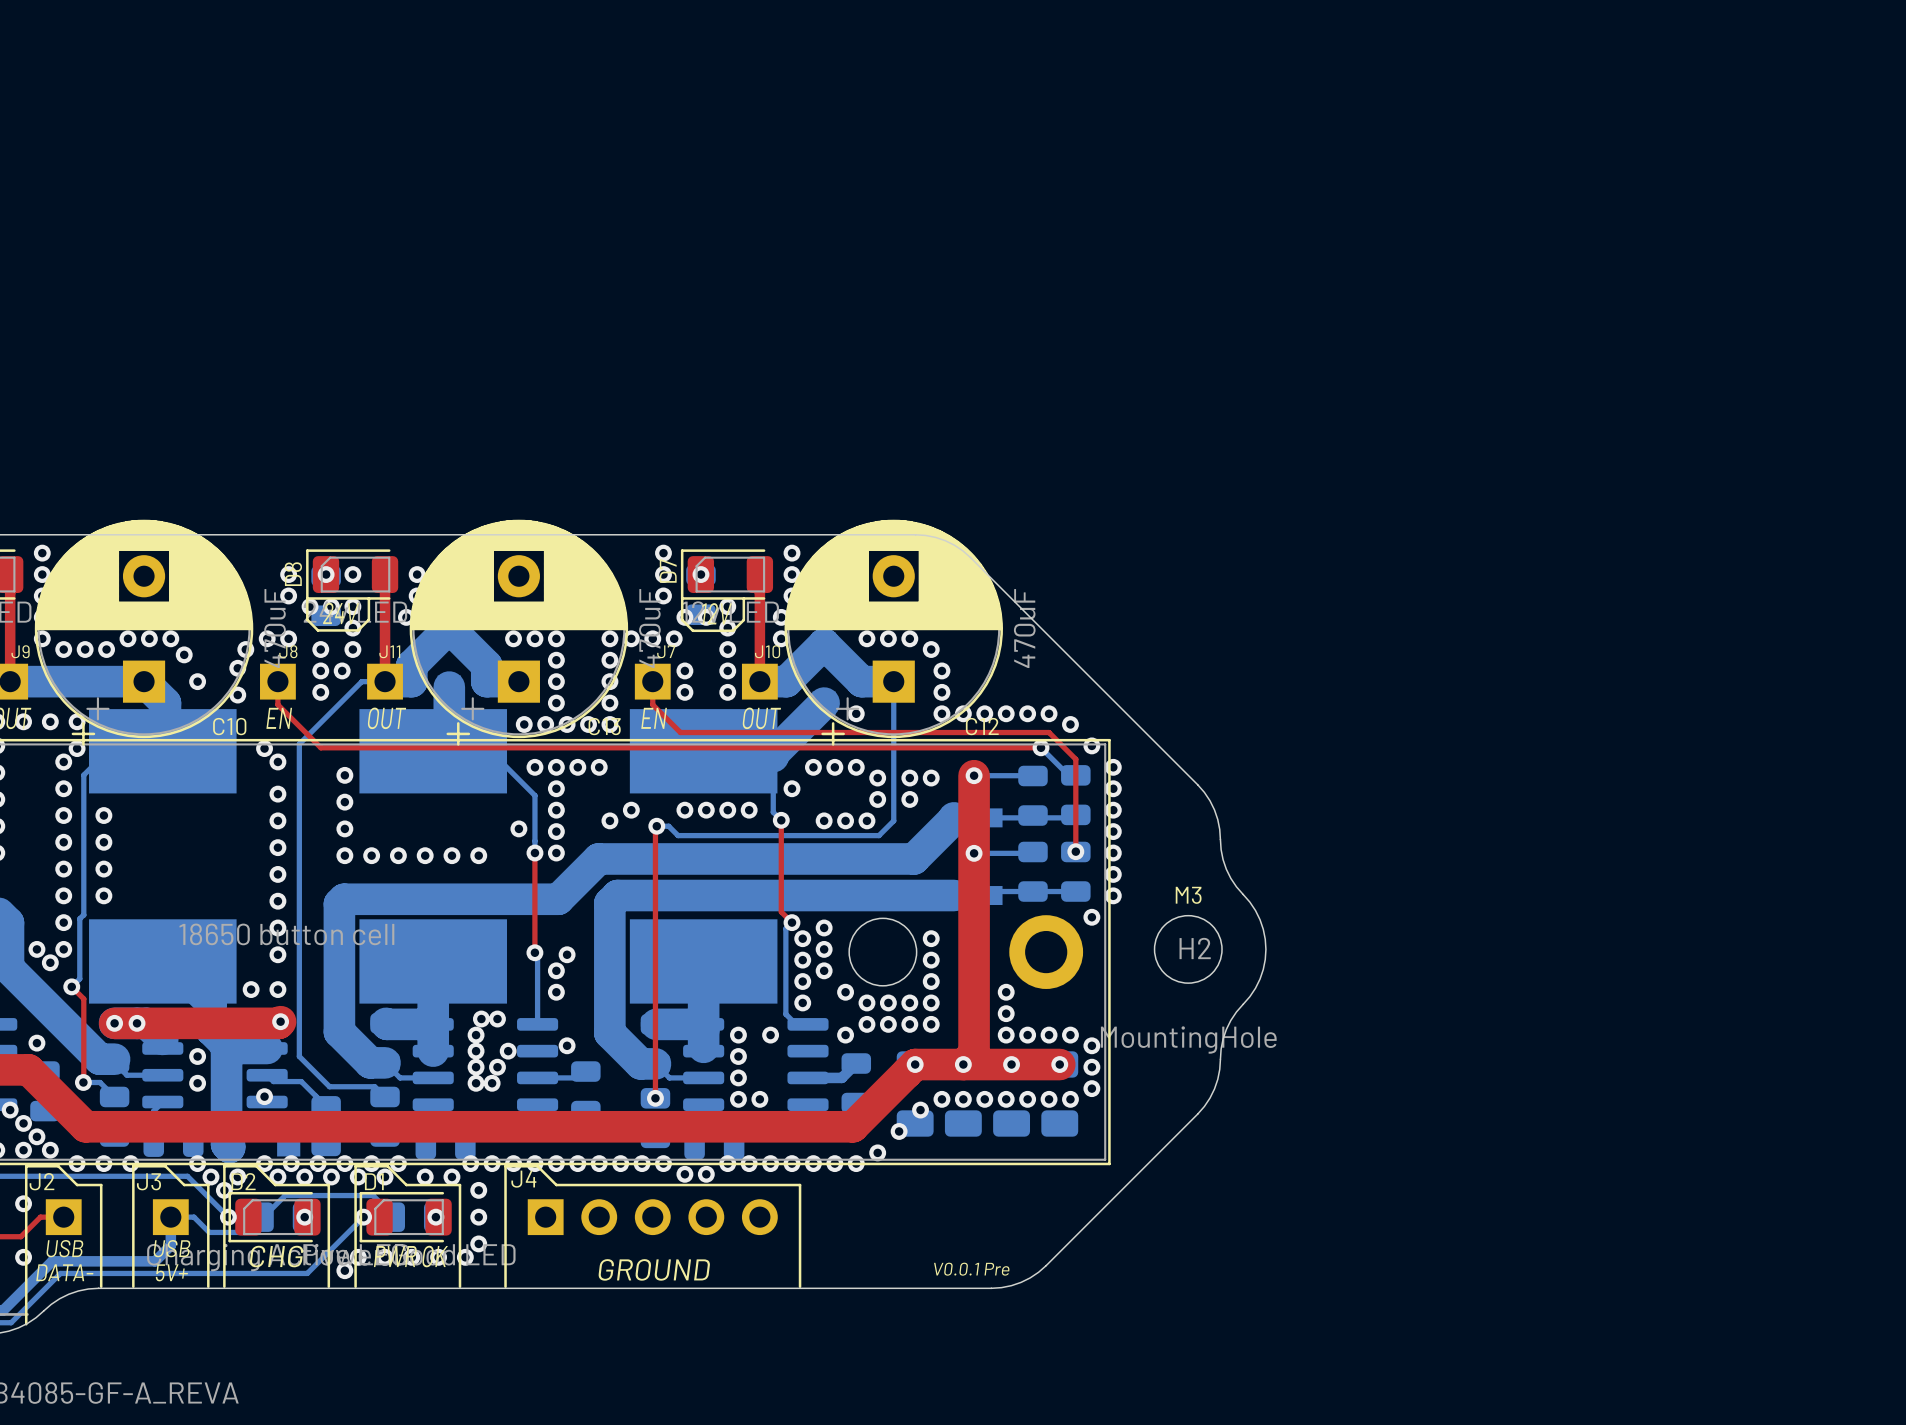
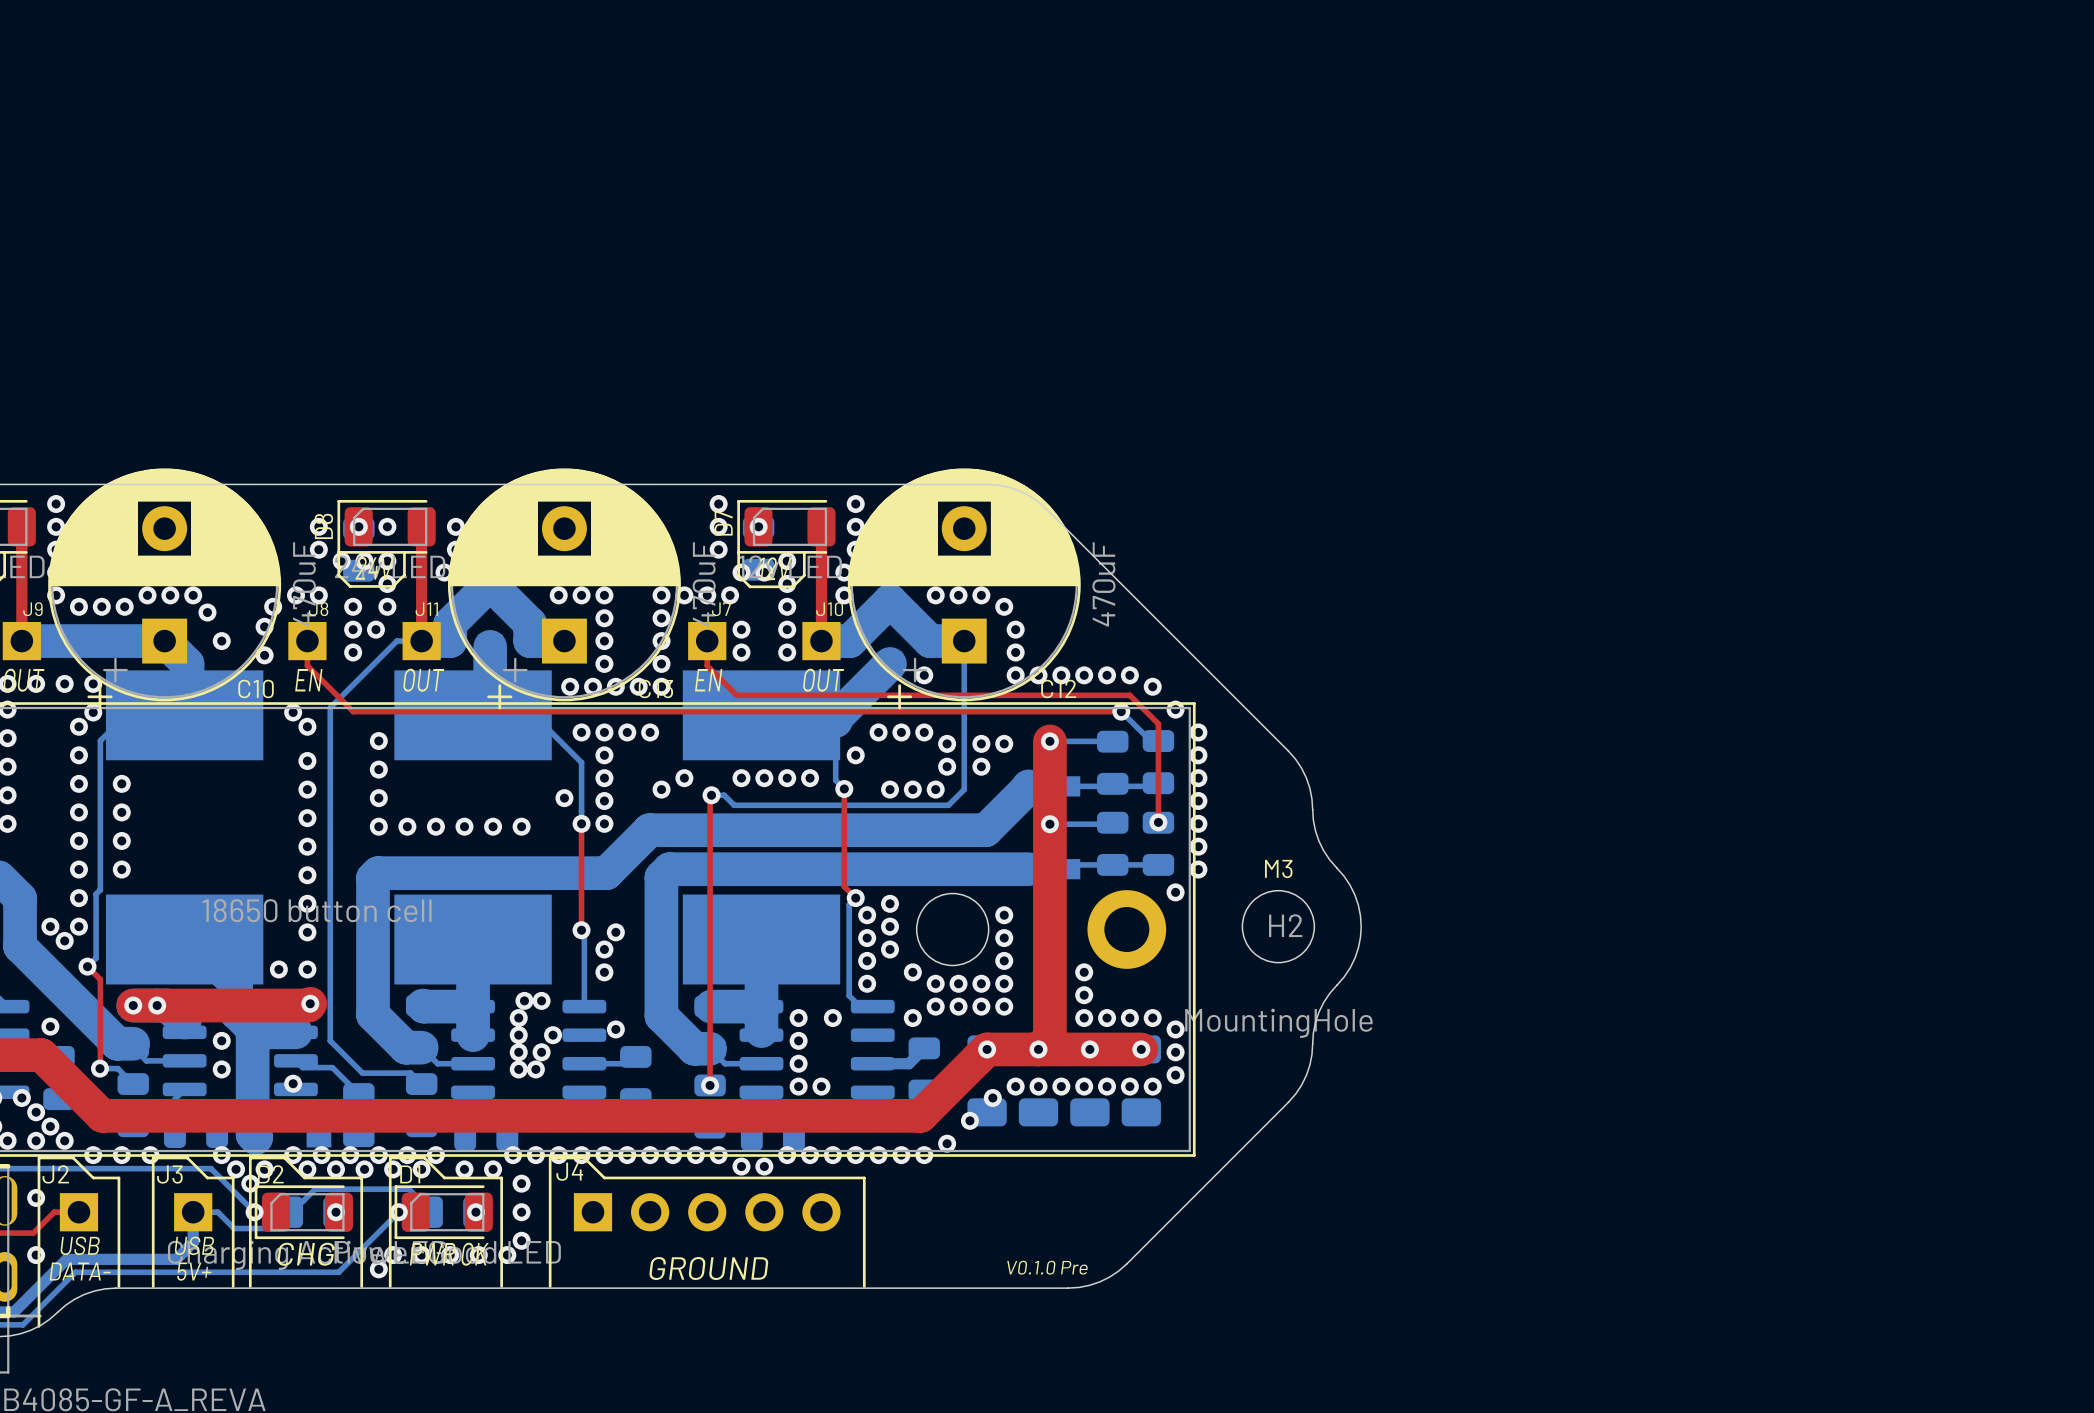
text: V0.0.1 Pre (971, 1269) -> V0.1.0 Pre (1047, 1267)

